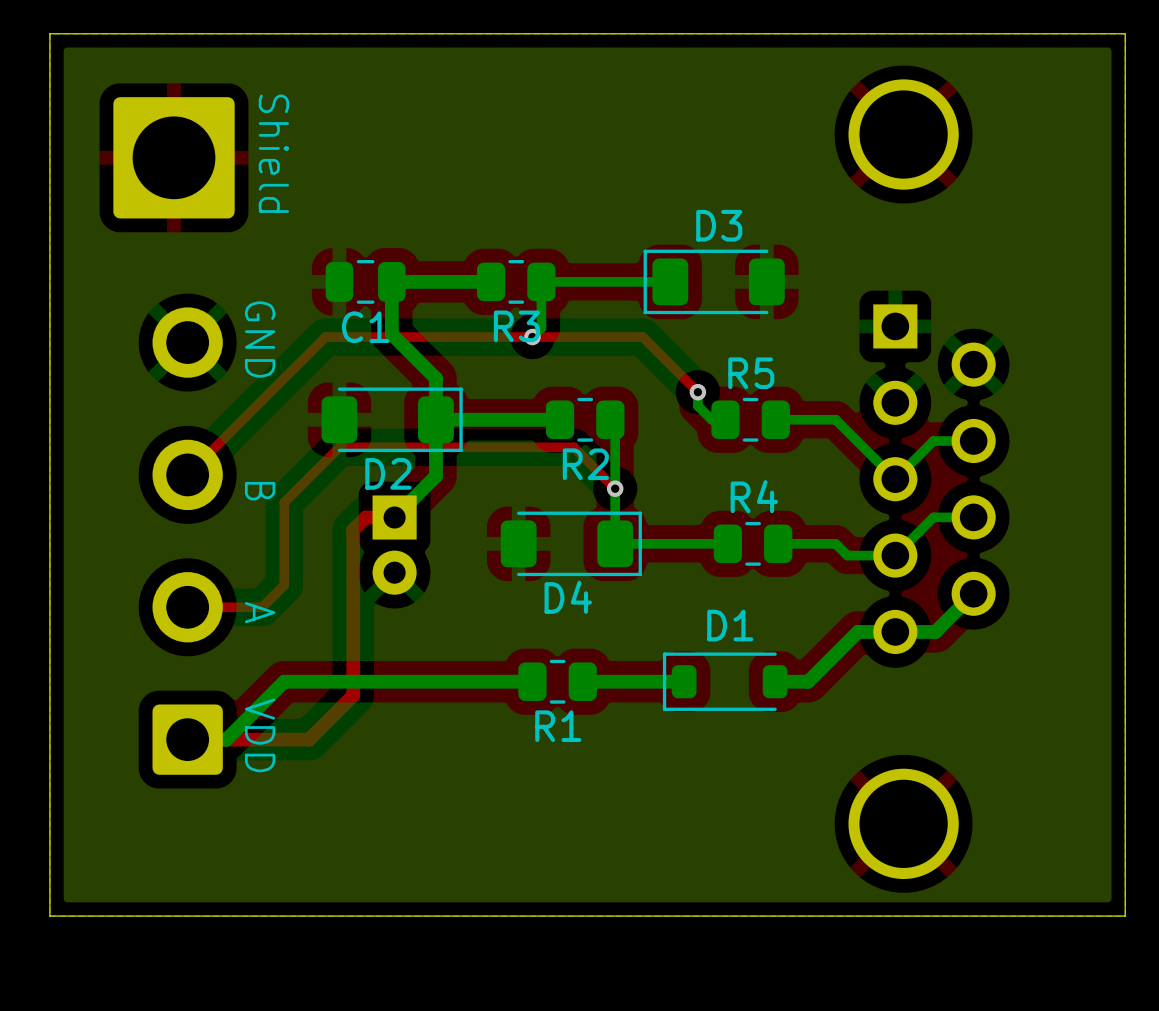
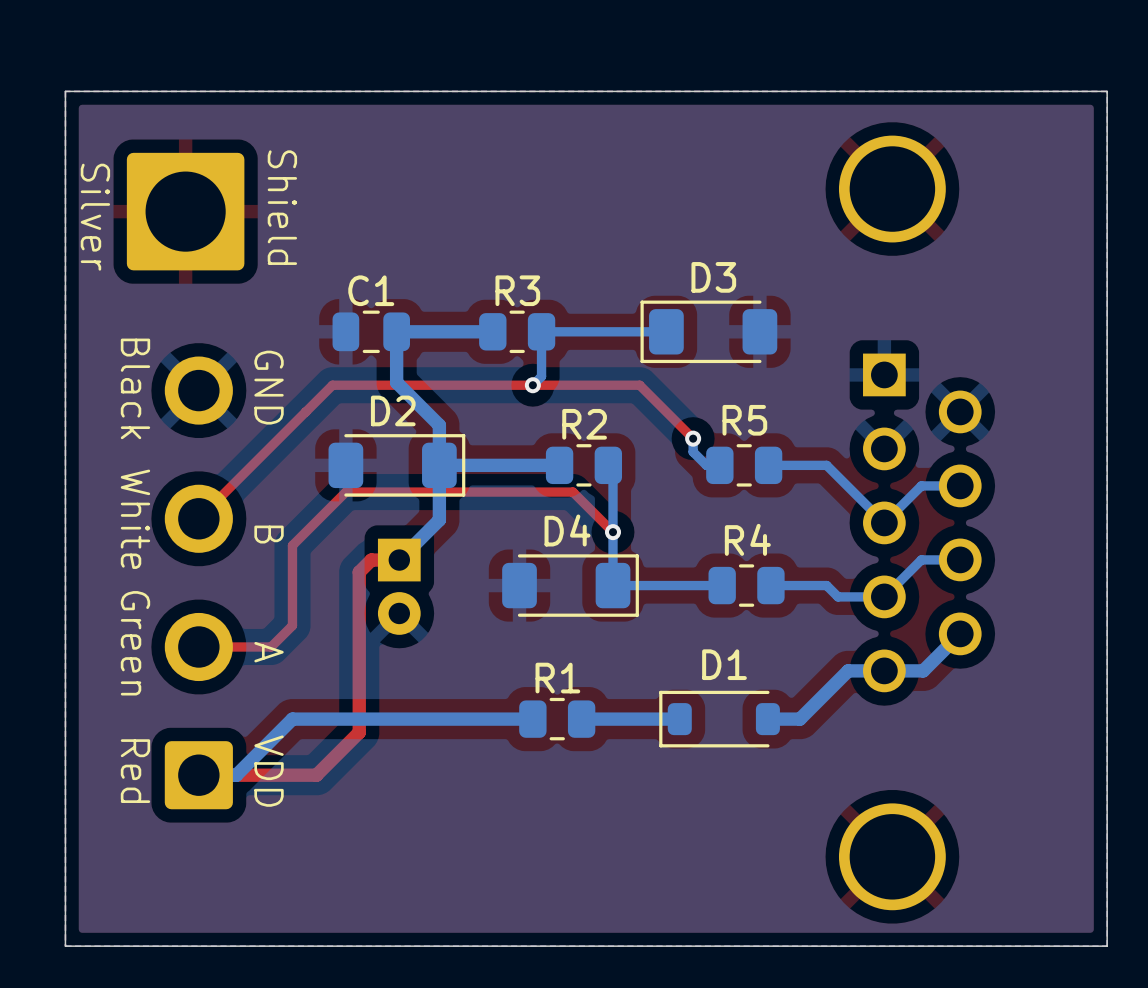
text: none -> Silver (95, 217)
R3 name position: R3 (516, 326) -> R3 (517, 290)
C1 name position: C1 (365, 327) -> C1 (371, 290)
text: none -> Black (135, 388)
R2 name position: R2 (585, 464) -> R2 (584, 424)
D2 name position: D2 (388, 473) -> D2 (393, 410)
text: none -> White (135, 519)
D4 name position: D4 (568, 597) -> D4 (567, 530)
text: none -> Green (135, 643)
R1 name position: R1 (558, 726) -> R1 (557, 678)
text: none -> Red (135, 771)

